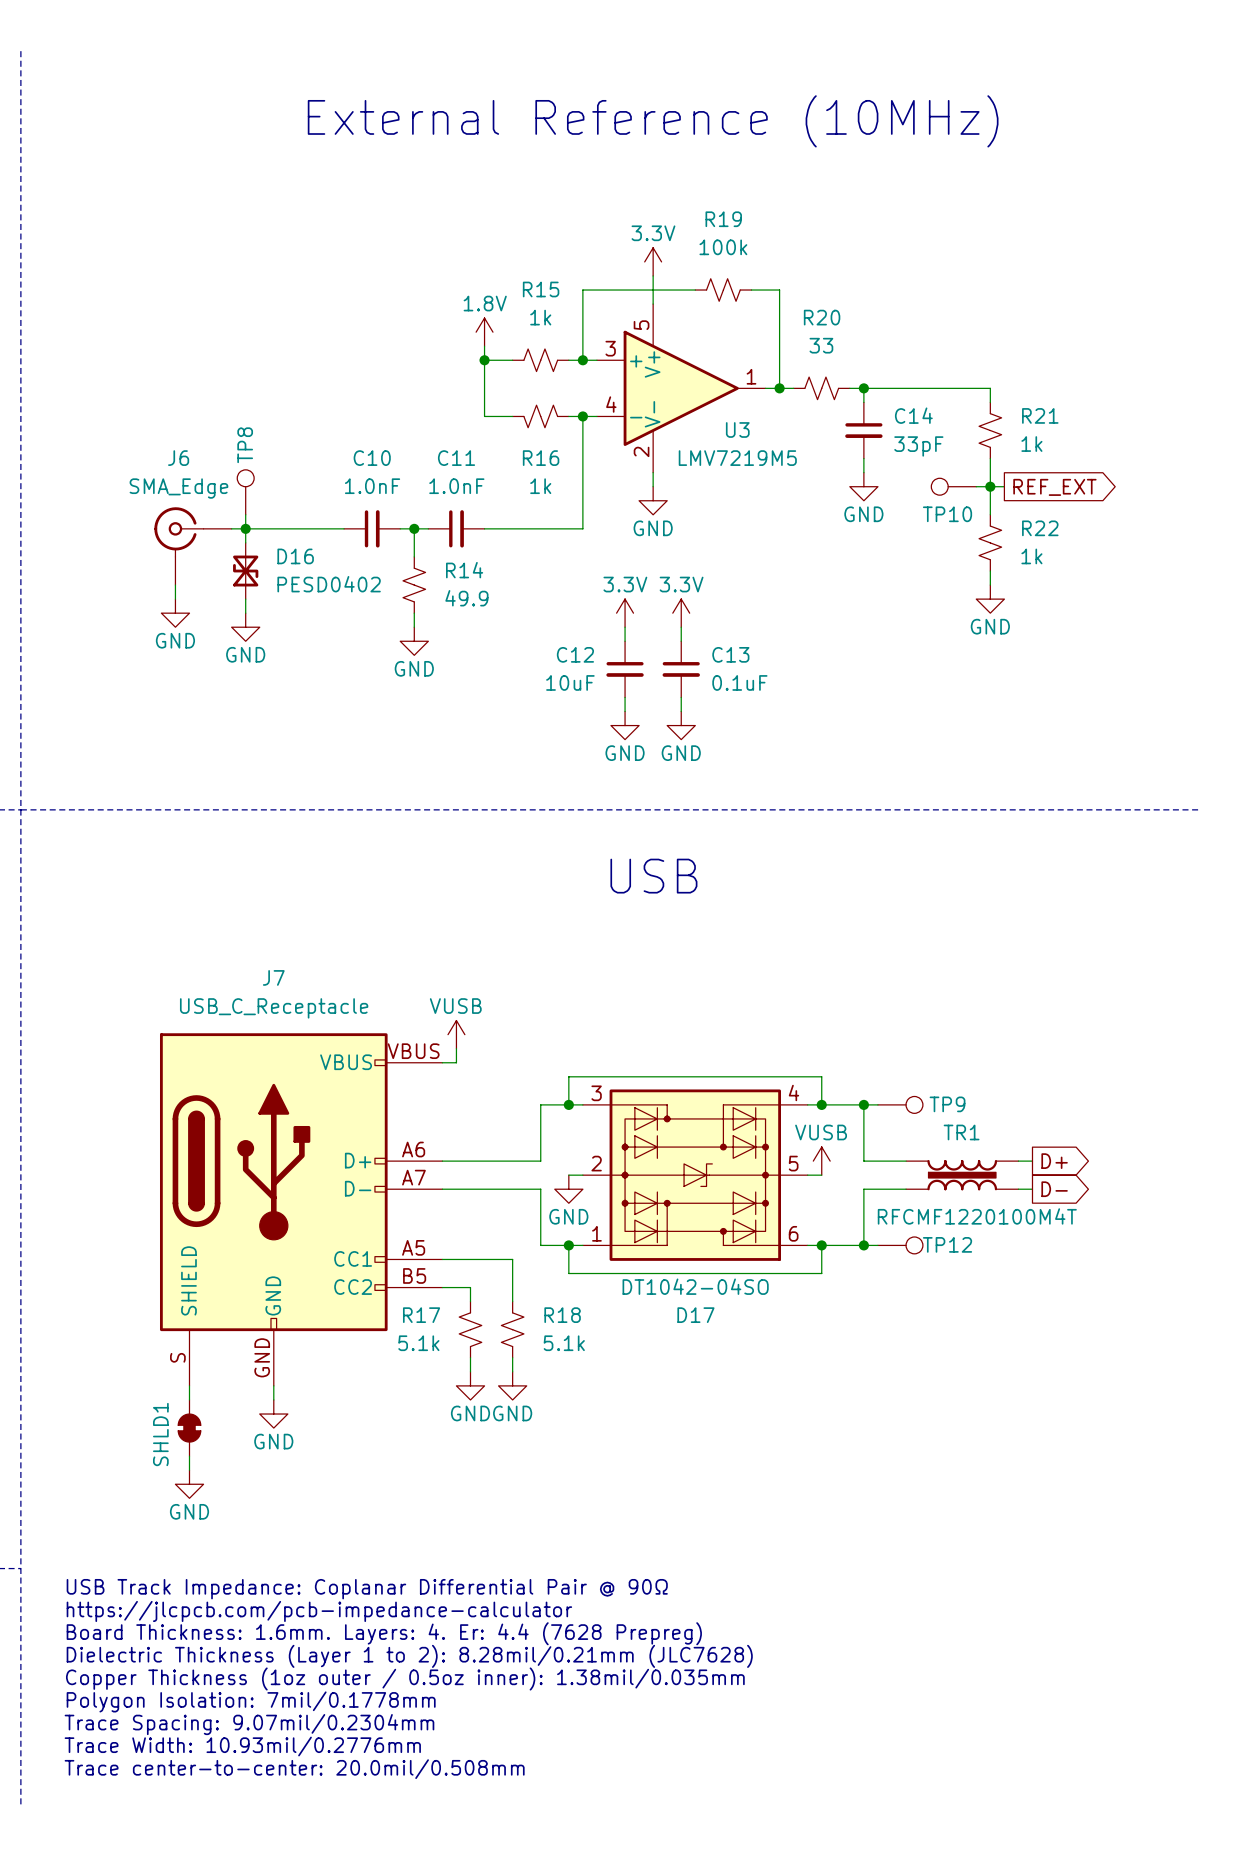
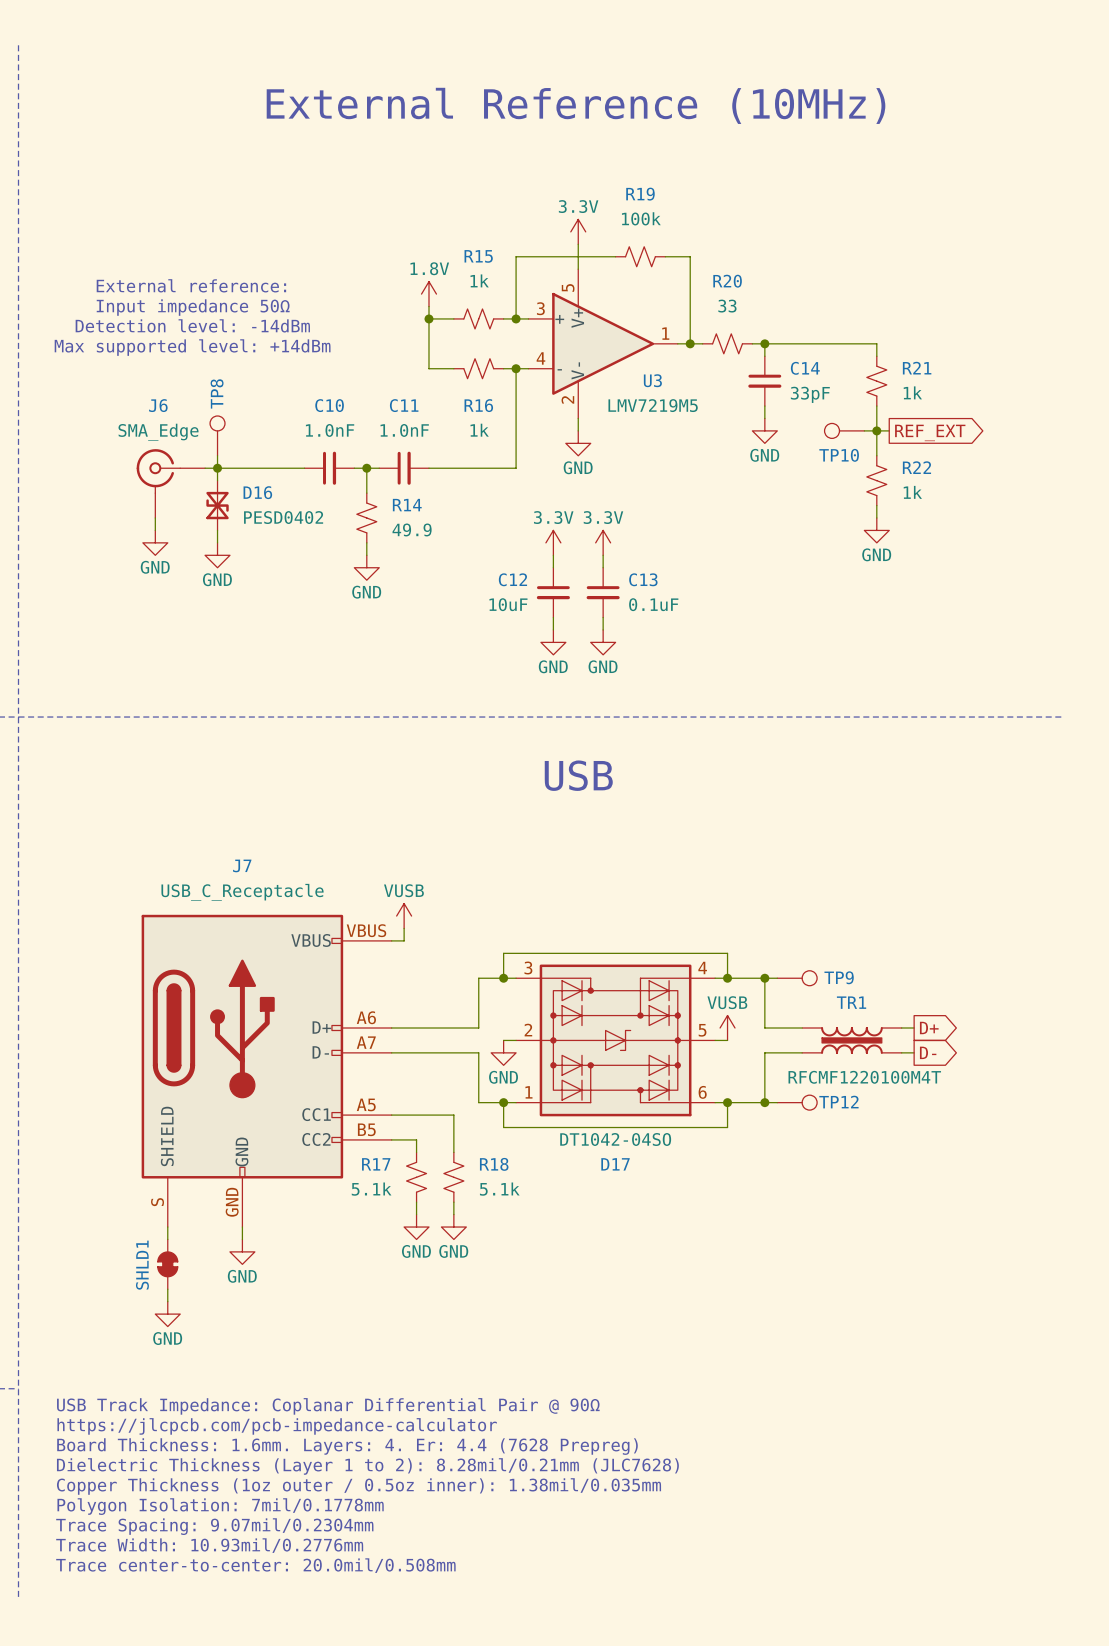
text: none -> External reference: (191, 285)
text: none -> Input impedance 50Ω (193, 307)
text: none -> Detection level: -14dBm (192, 325)
text: none -> Max supported level: +14dBm (192, 347)

